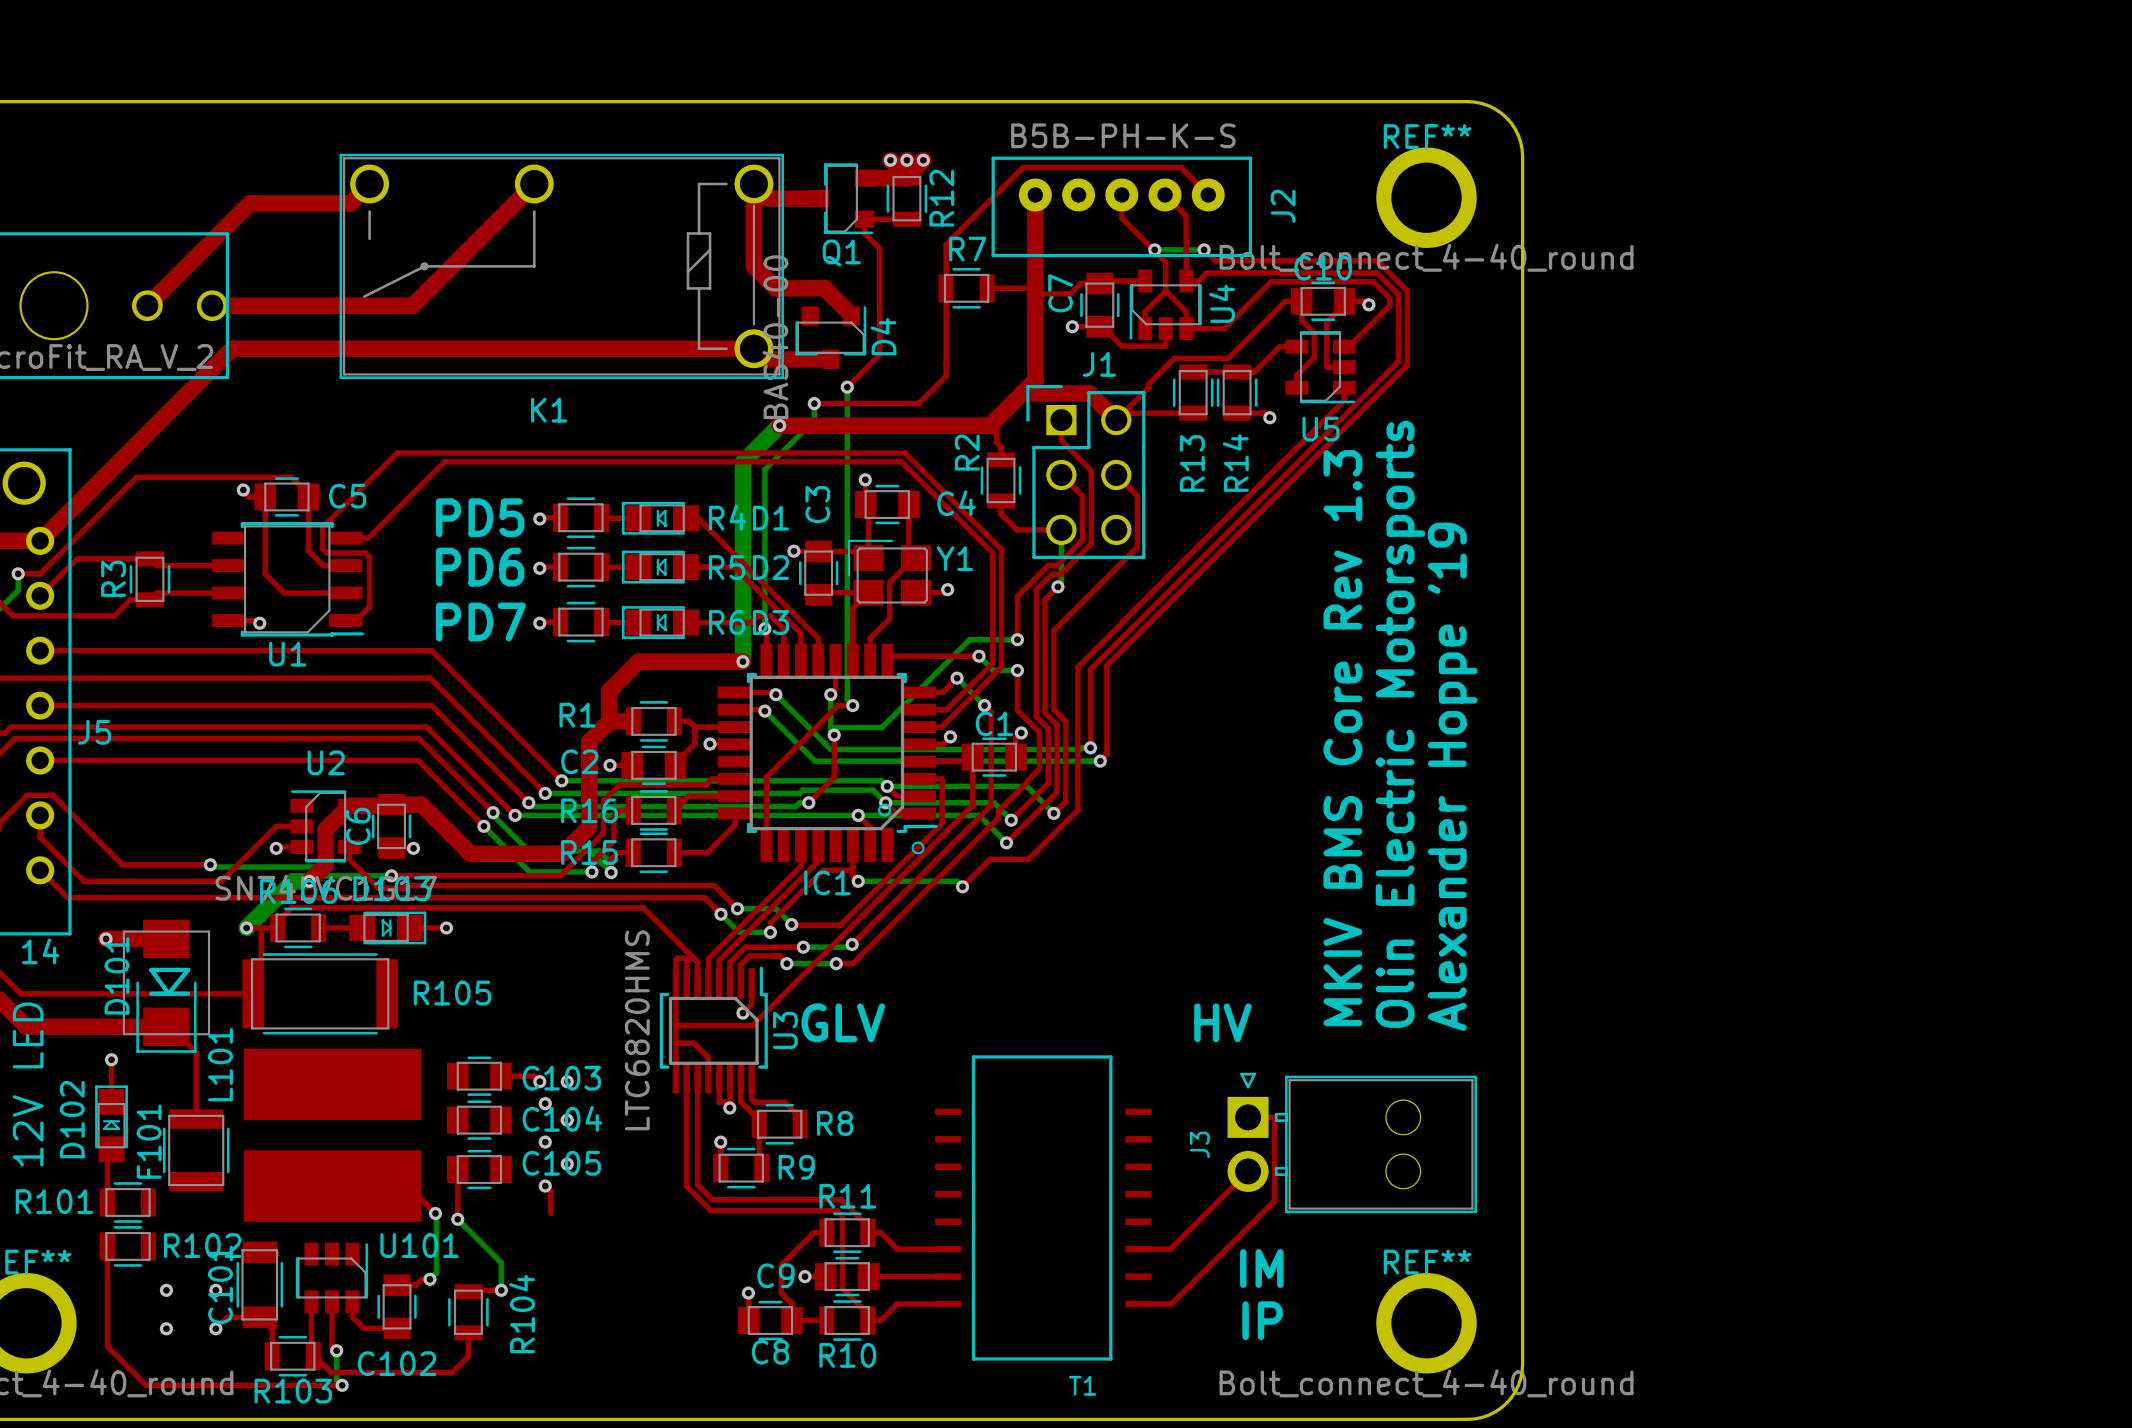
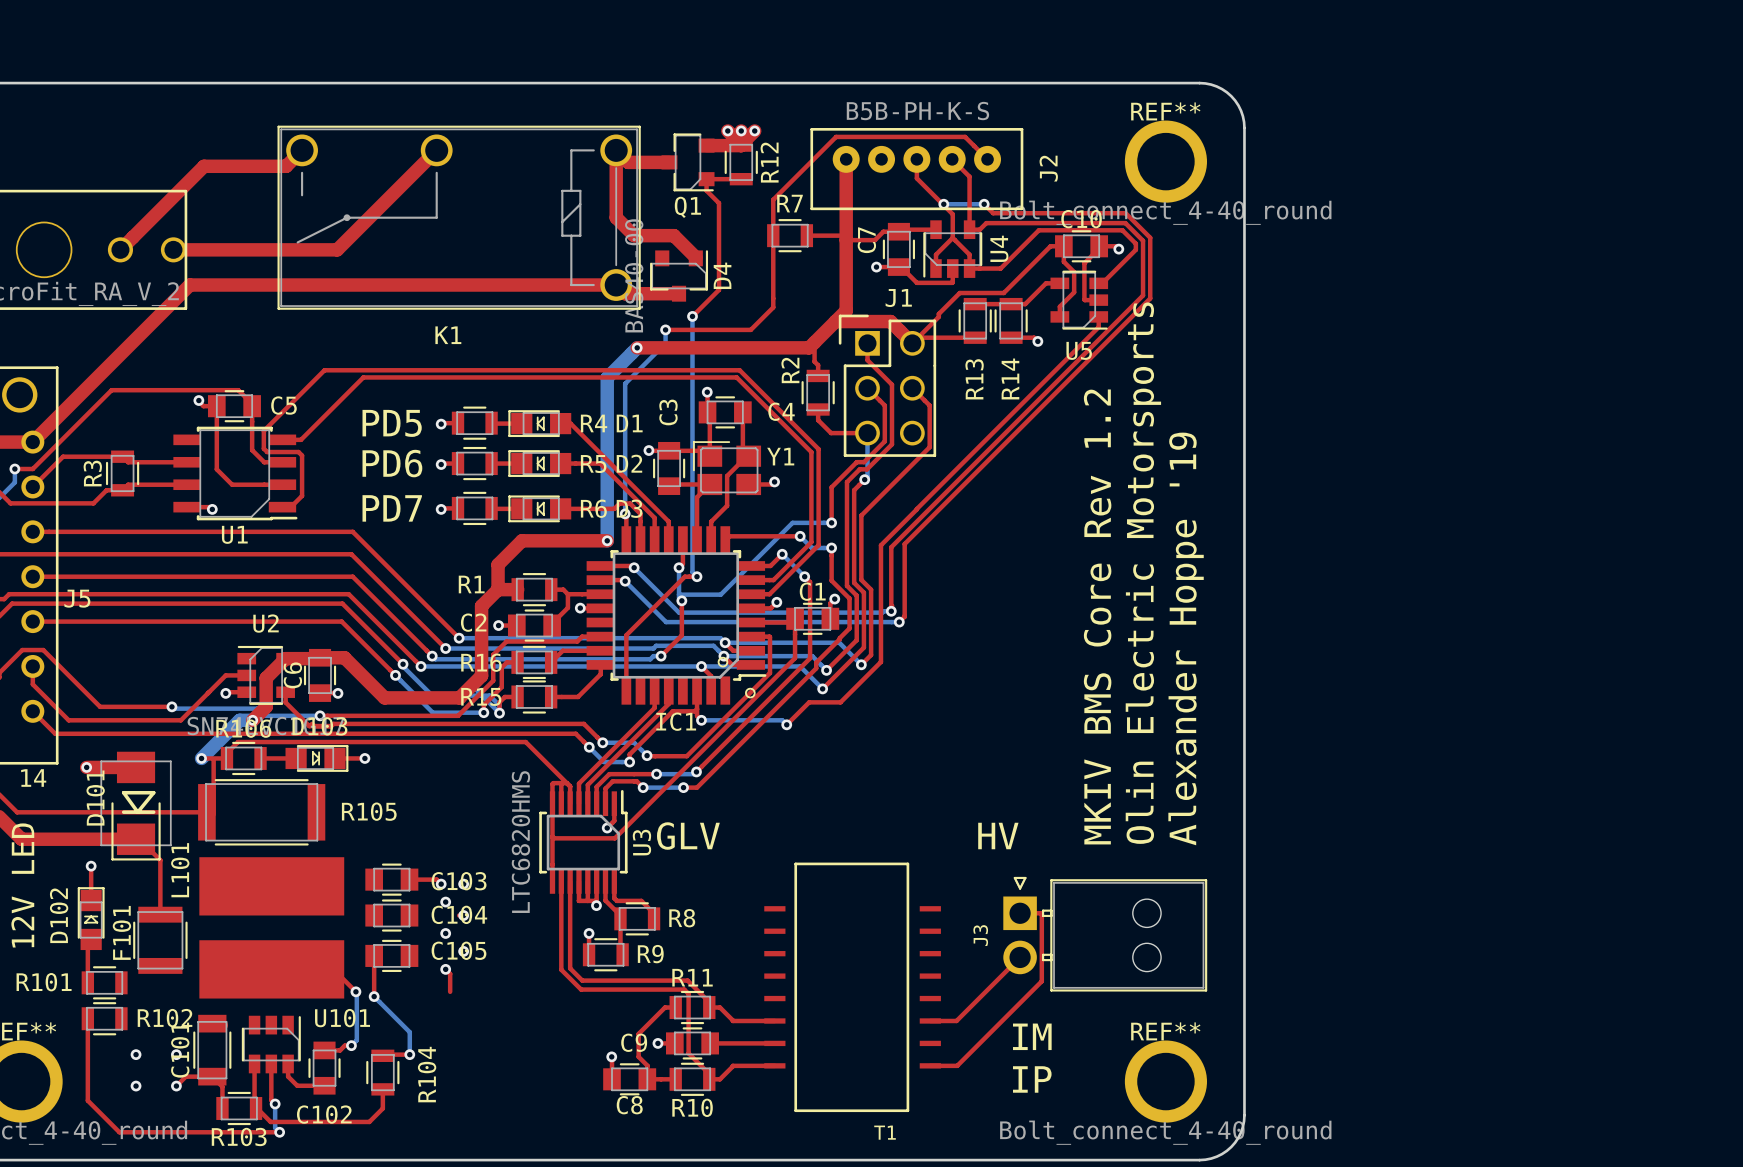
text: MKIV BMS Core Rev 1.3 (1342, 738) -> MKIV BMS Core Rev 1.2 (1097, 616)
top track: (675, 1043) (693, 1043) (708, 1057) (708, 1078) -> (587, 900) (578, 900) (578, 881)

